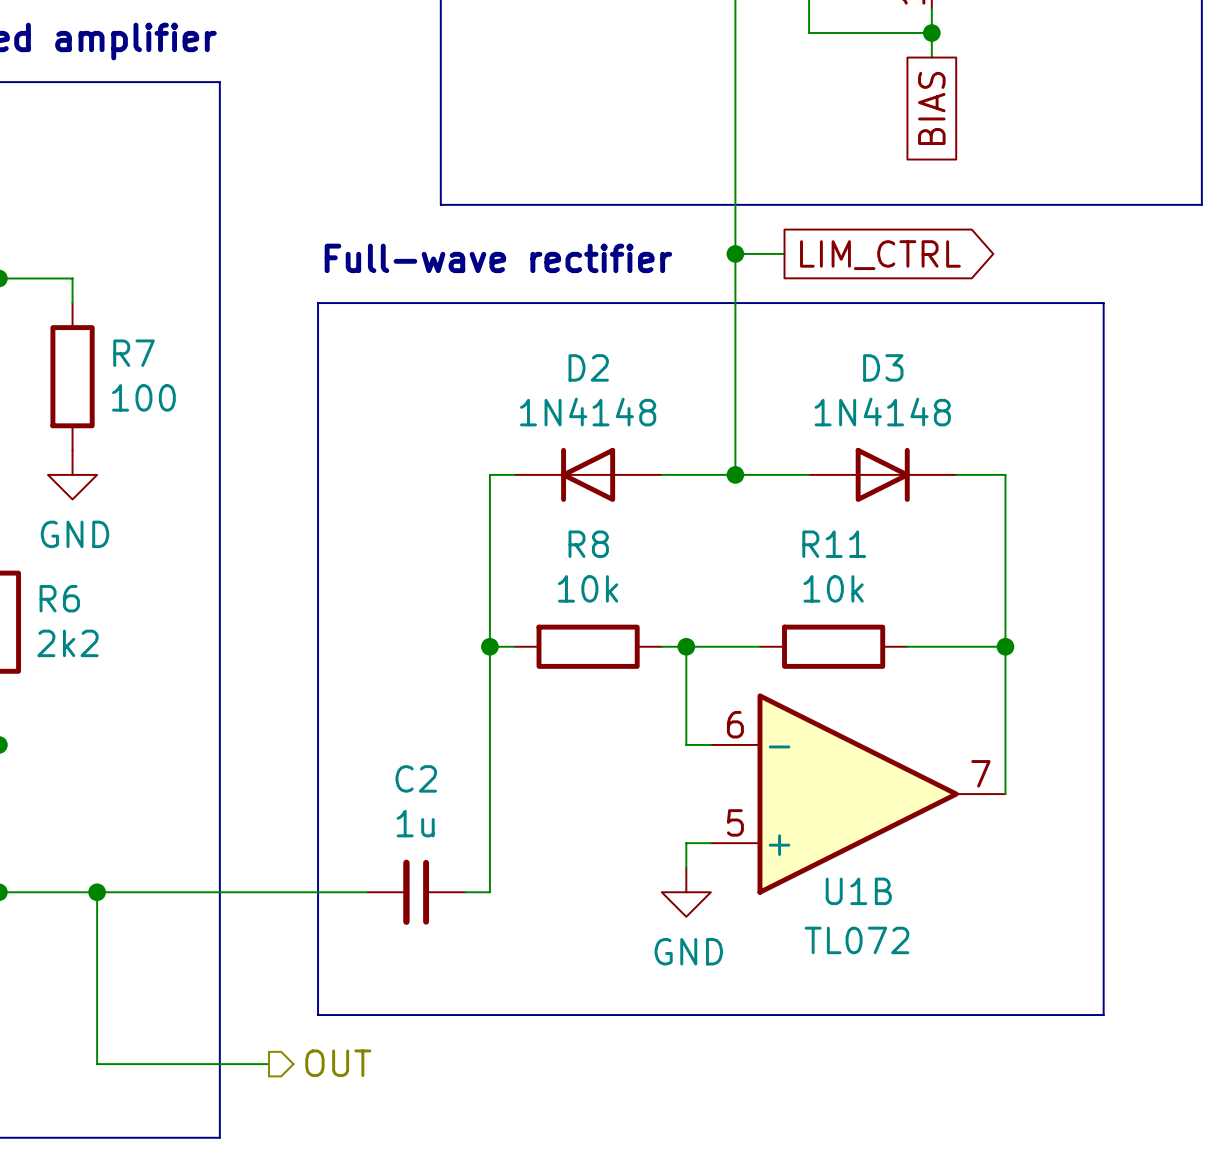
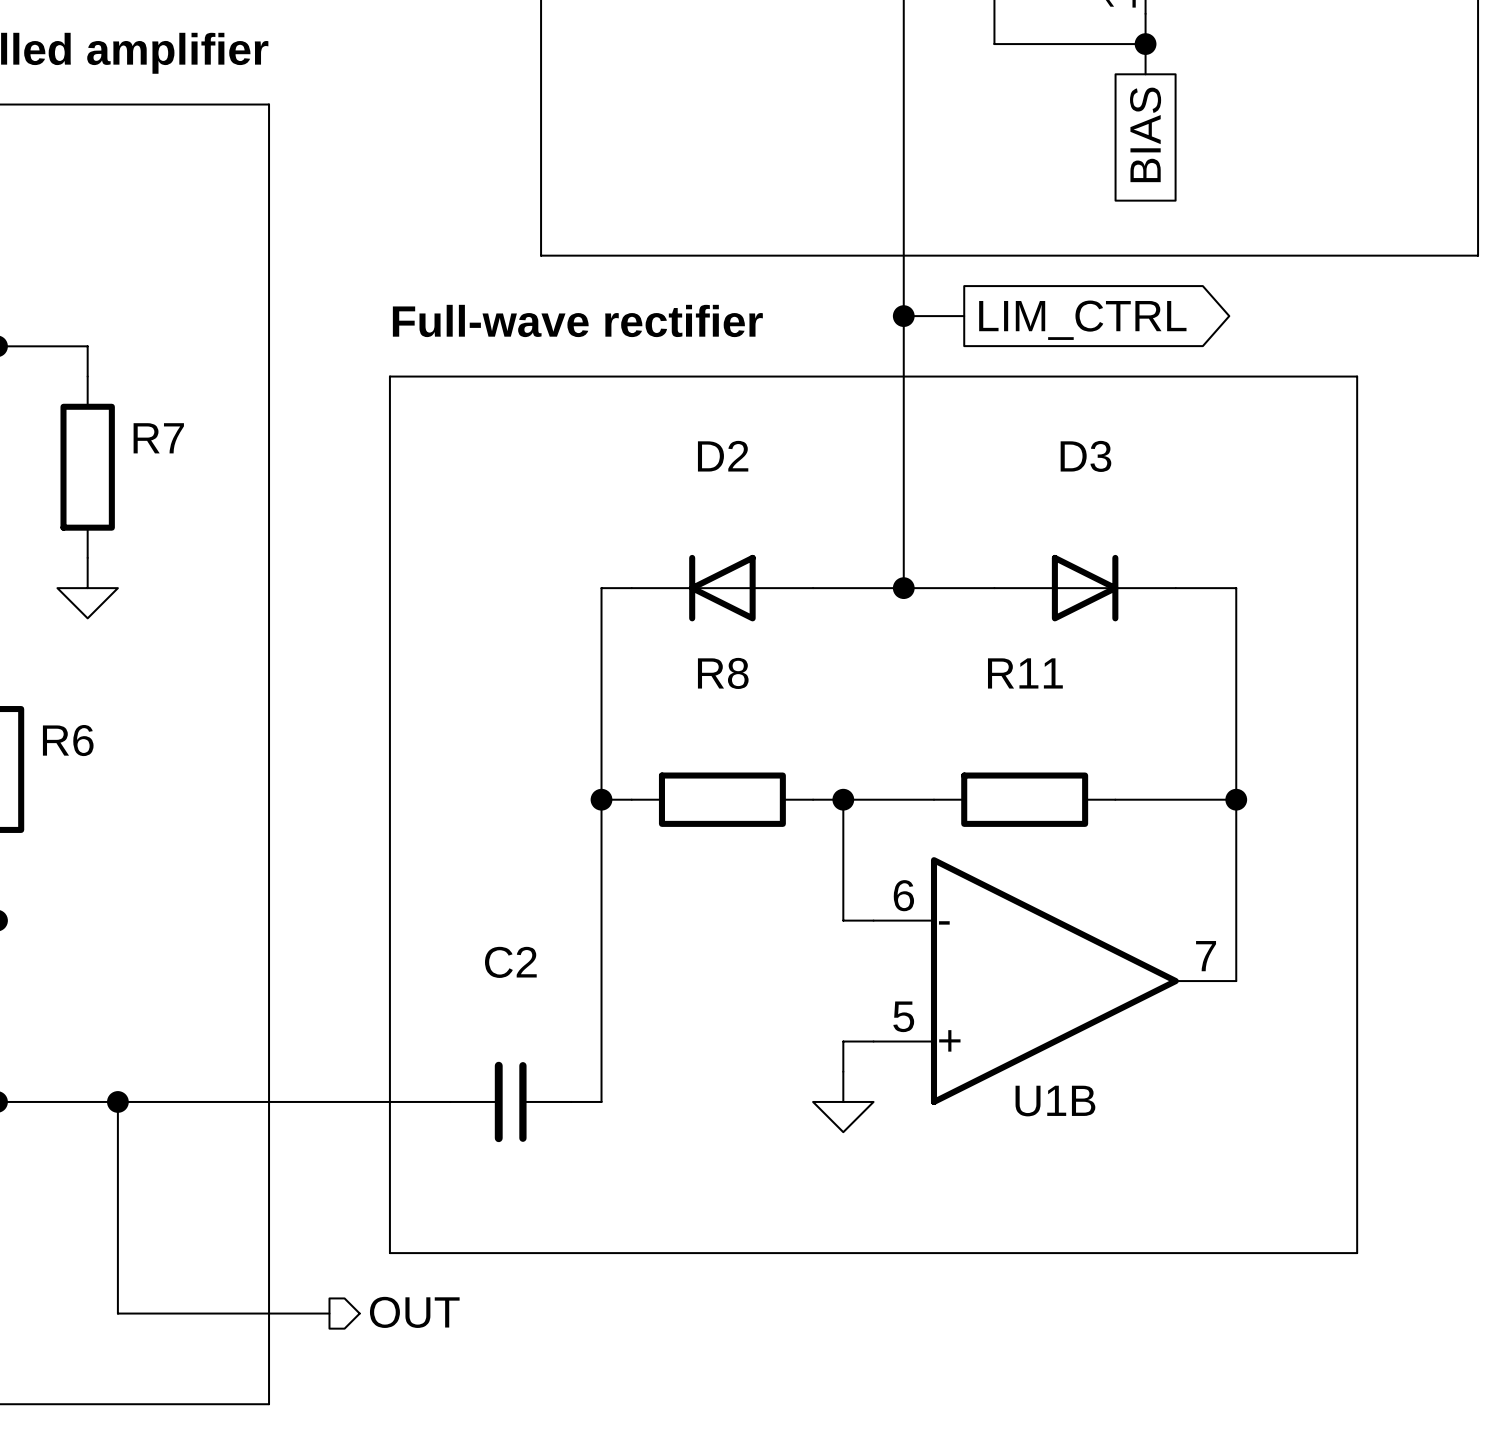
R7 value: 100 (143, 397) -> none
D2 value: 1N4148 (588, 412) -> none
D3 value: 1N4148 (882, 412) -> none
power symbol text: GND (75, 534) -> none
R8 value: 10k (588, 588) -> none
R11 value: 10k (833, 588) -> none
R6 value: 2k2 (67, 643) -> none
C2 value: 1u (415, 823) -> none
U1B value: TL072 (856, 940) -> none
power symbol text: GND (688, 951) -> none

